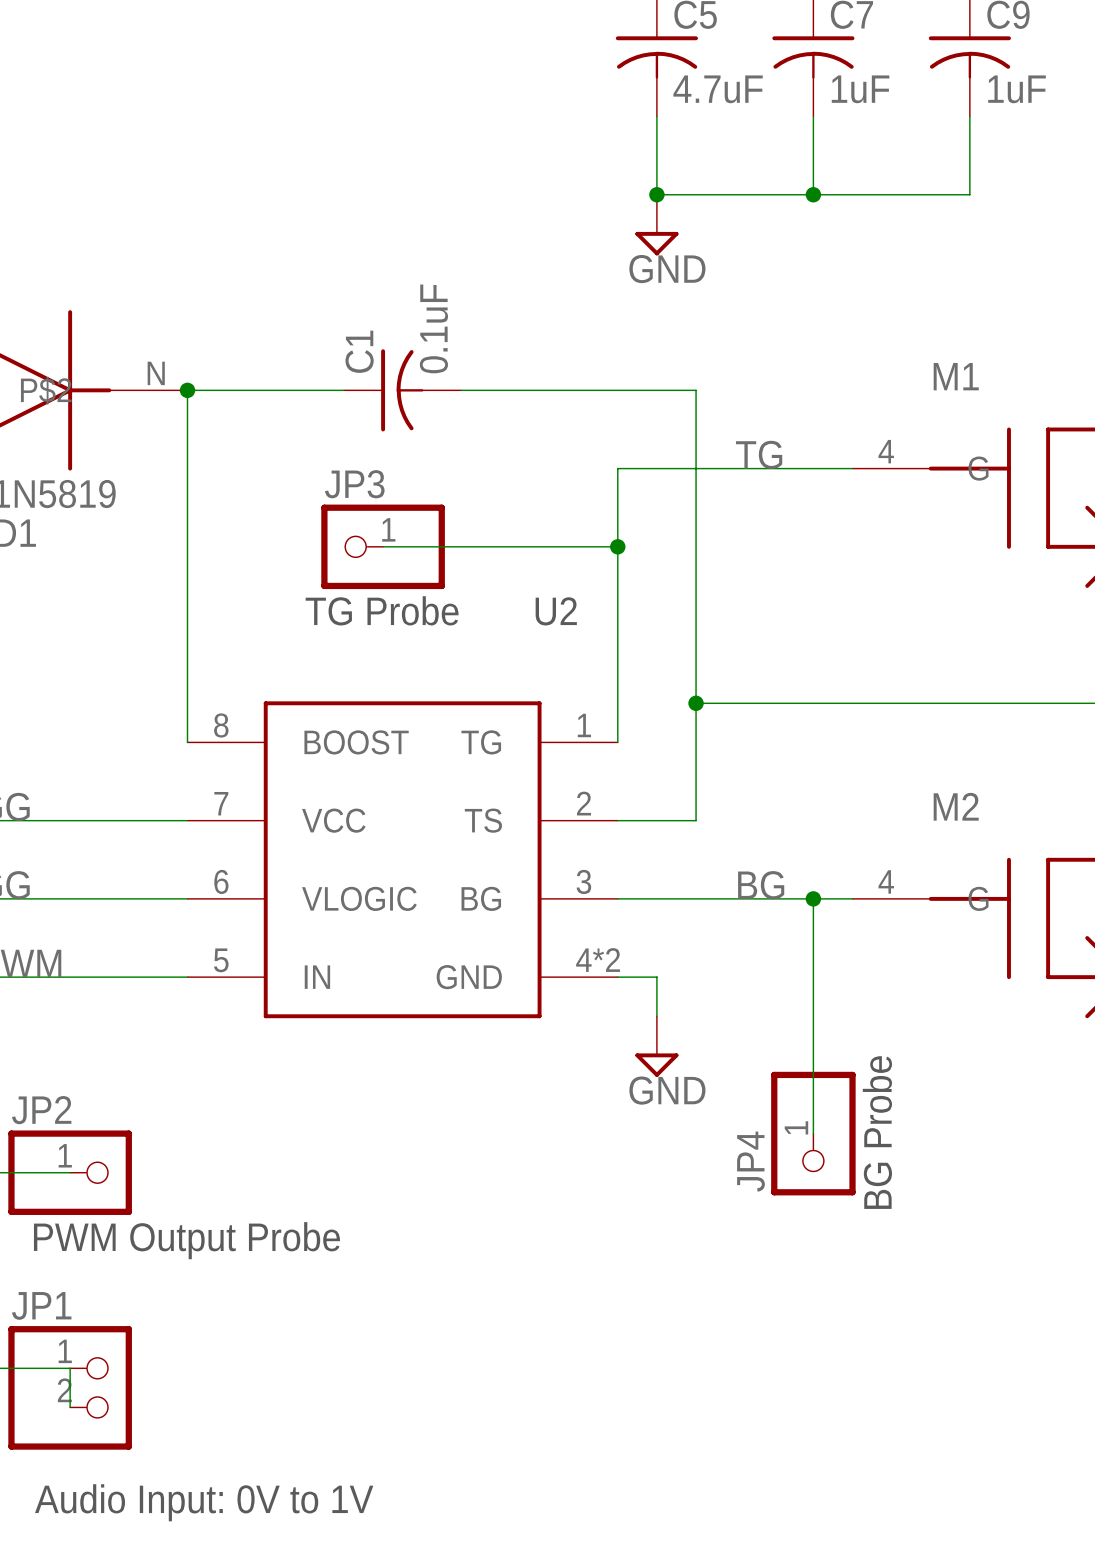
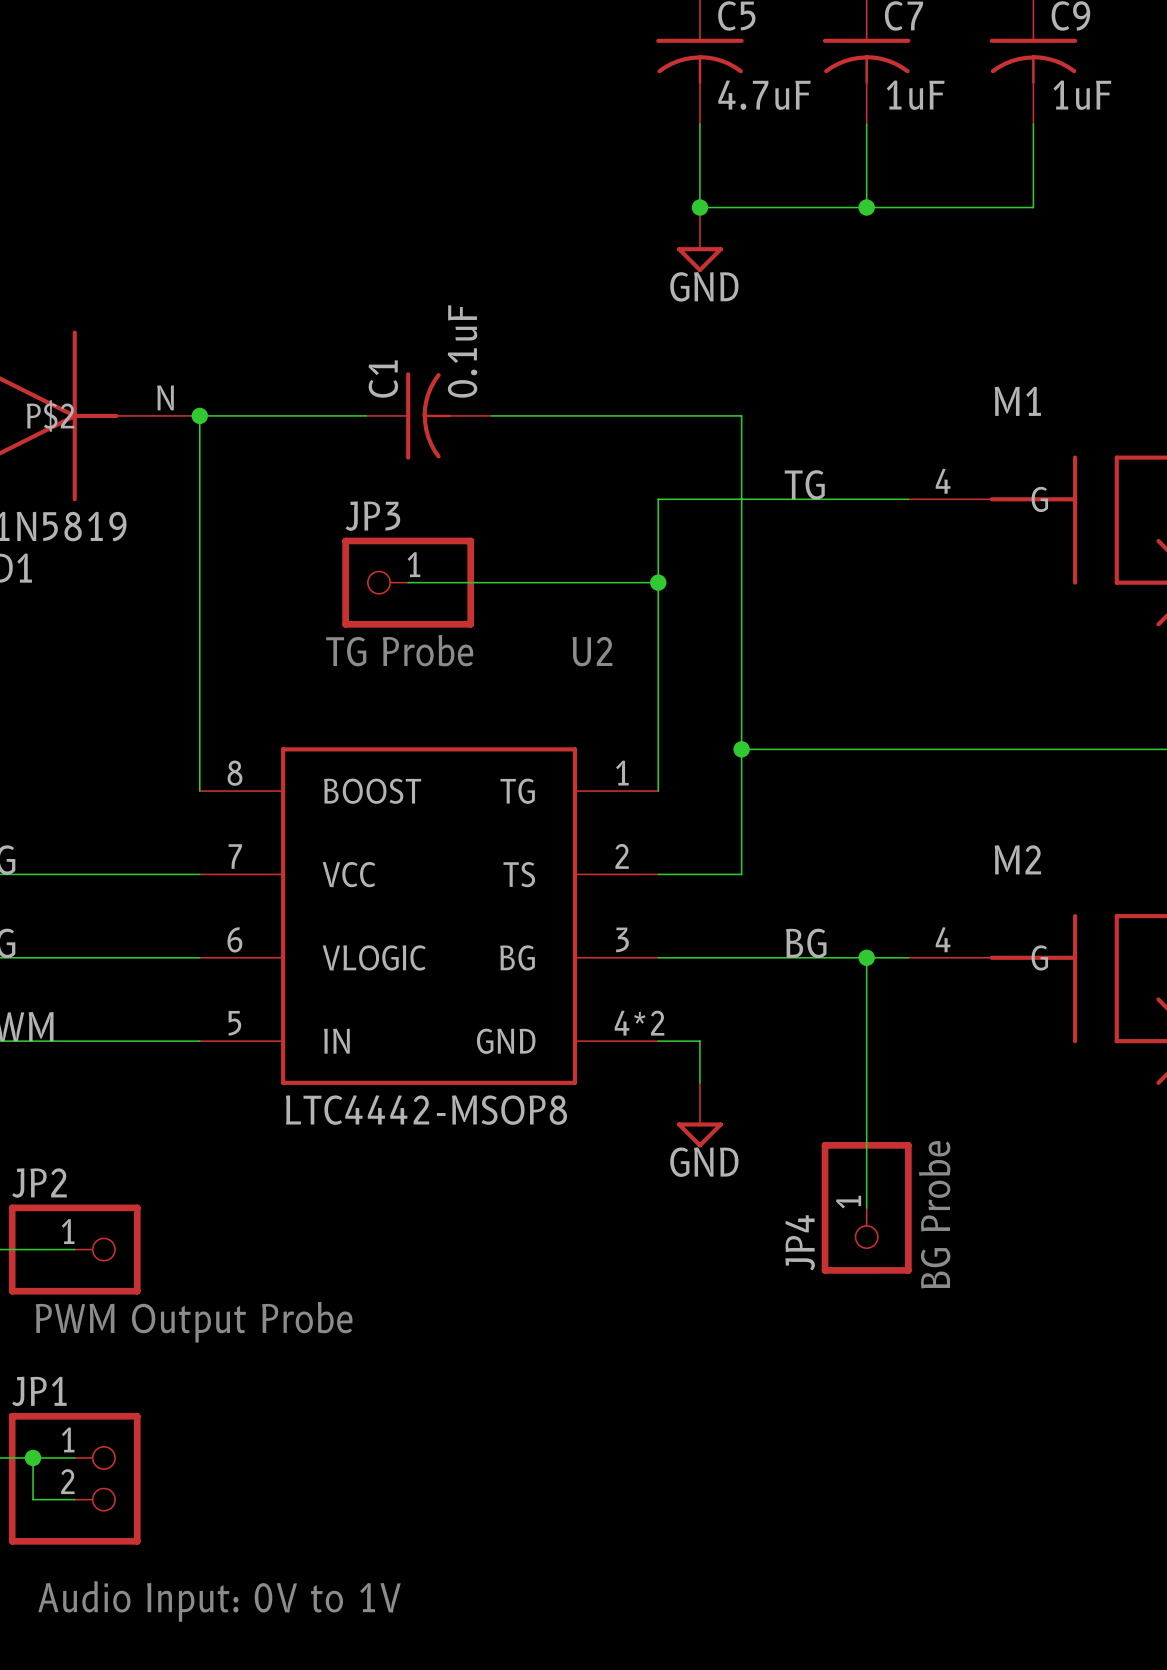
U2 value: none -> LTC4442-MSOP8 (426, 1110)
junction: none -> (33, 1457)
wire: (70, 1368) (70, 1407) -> (33, 1457) (33, 1499) (74, 1499)

